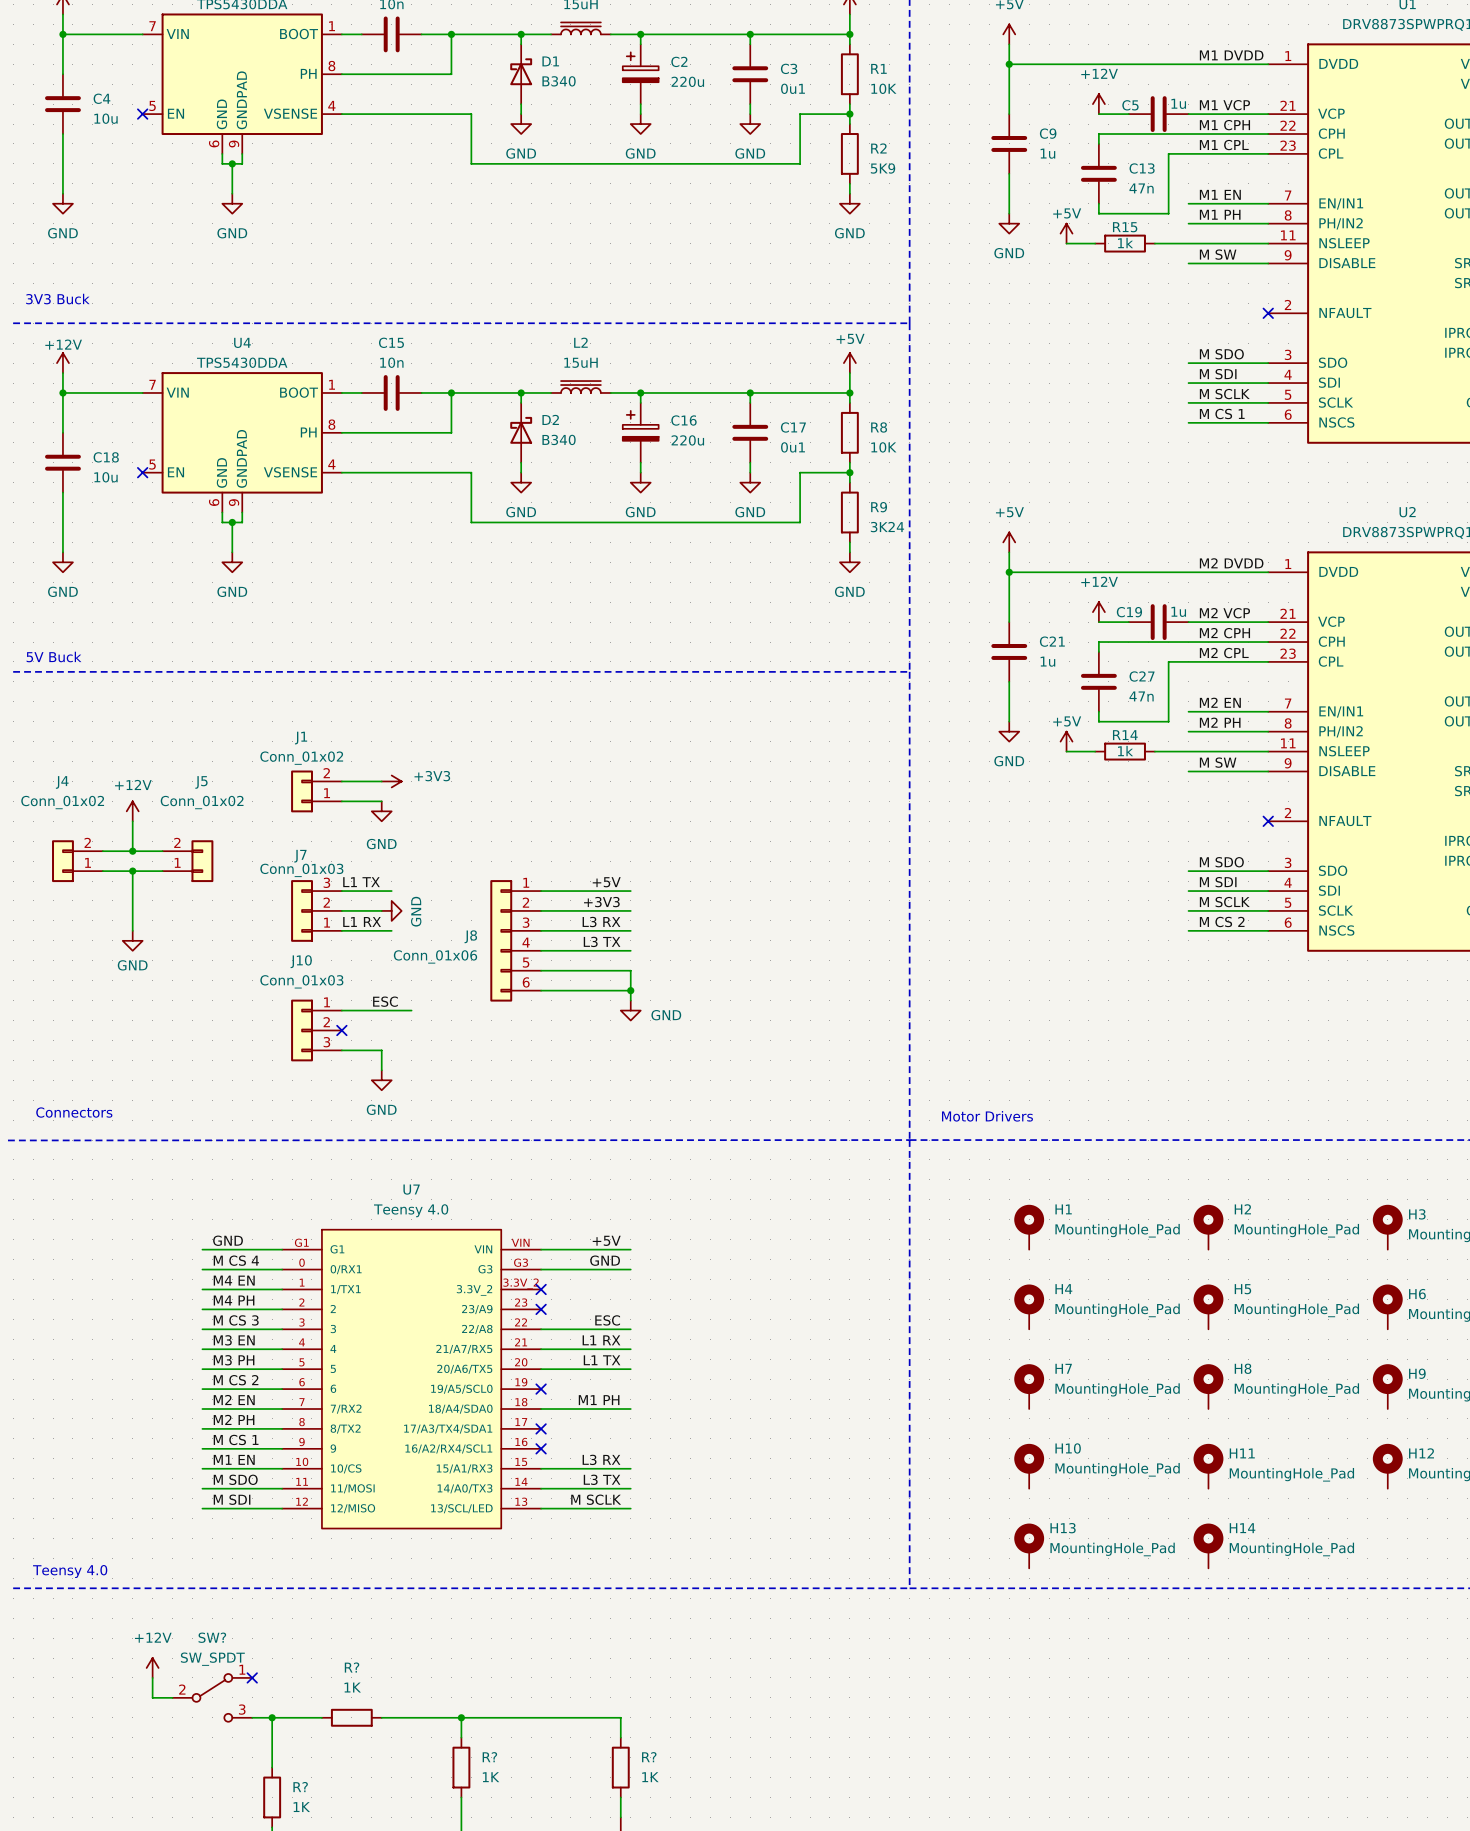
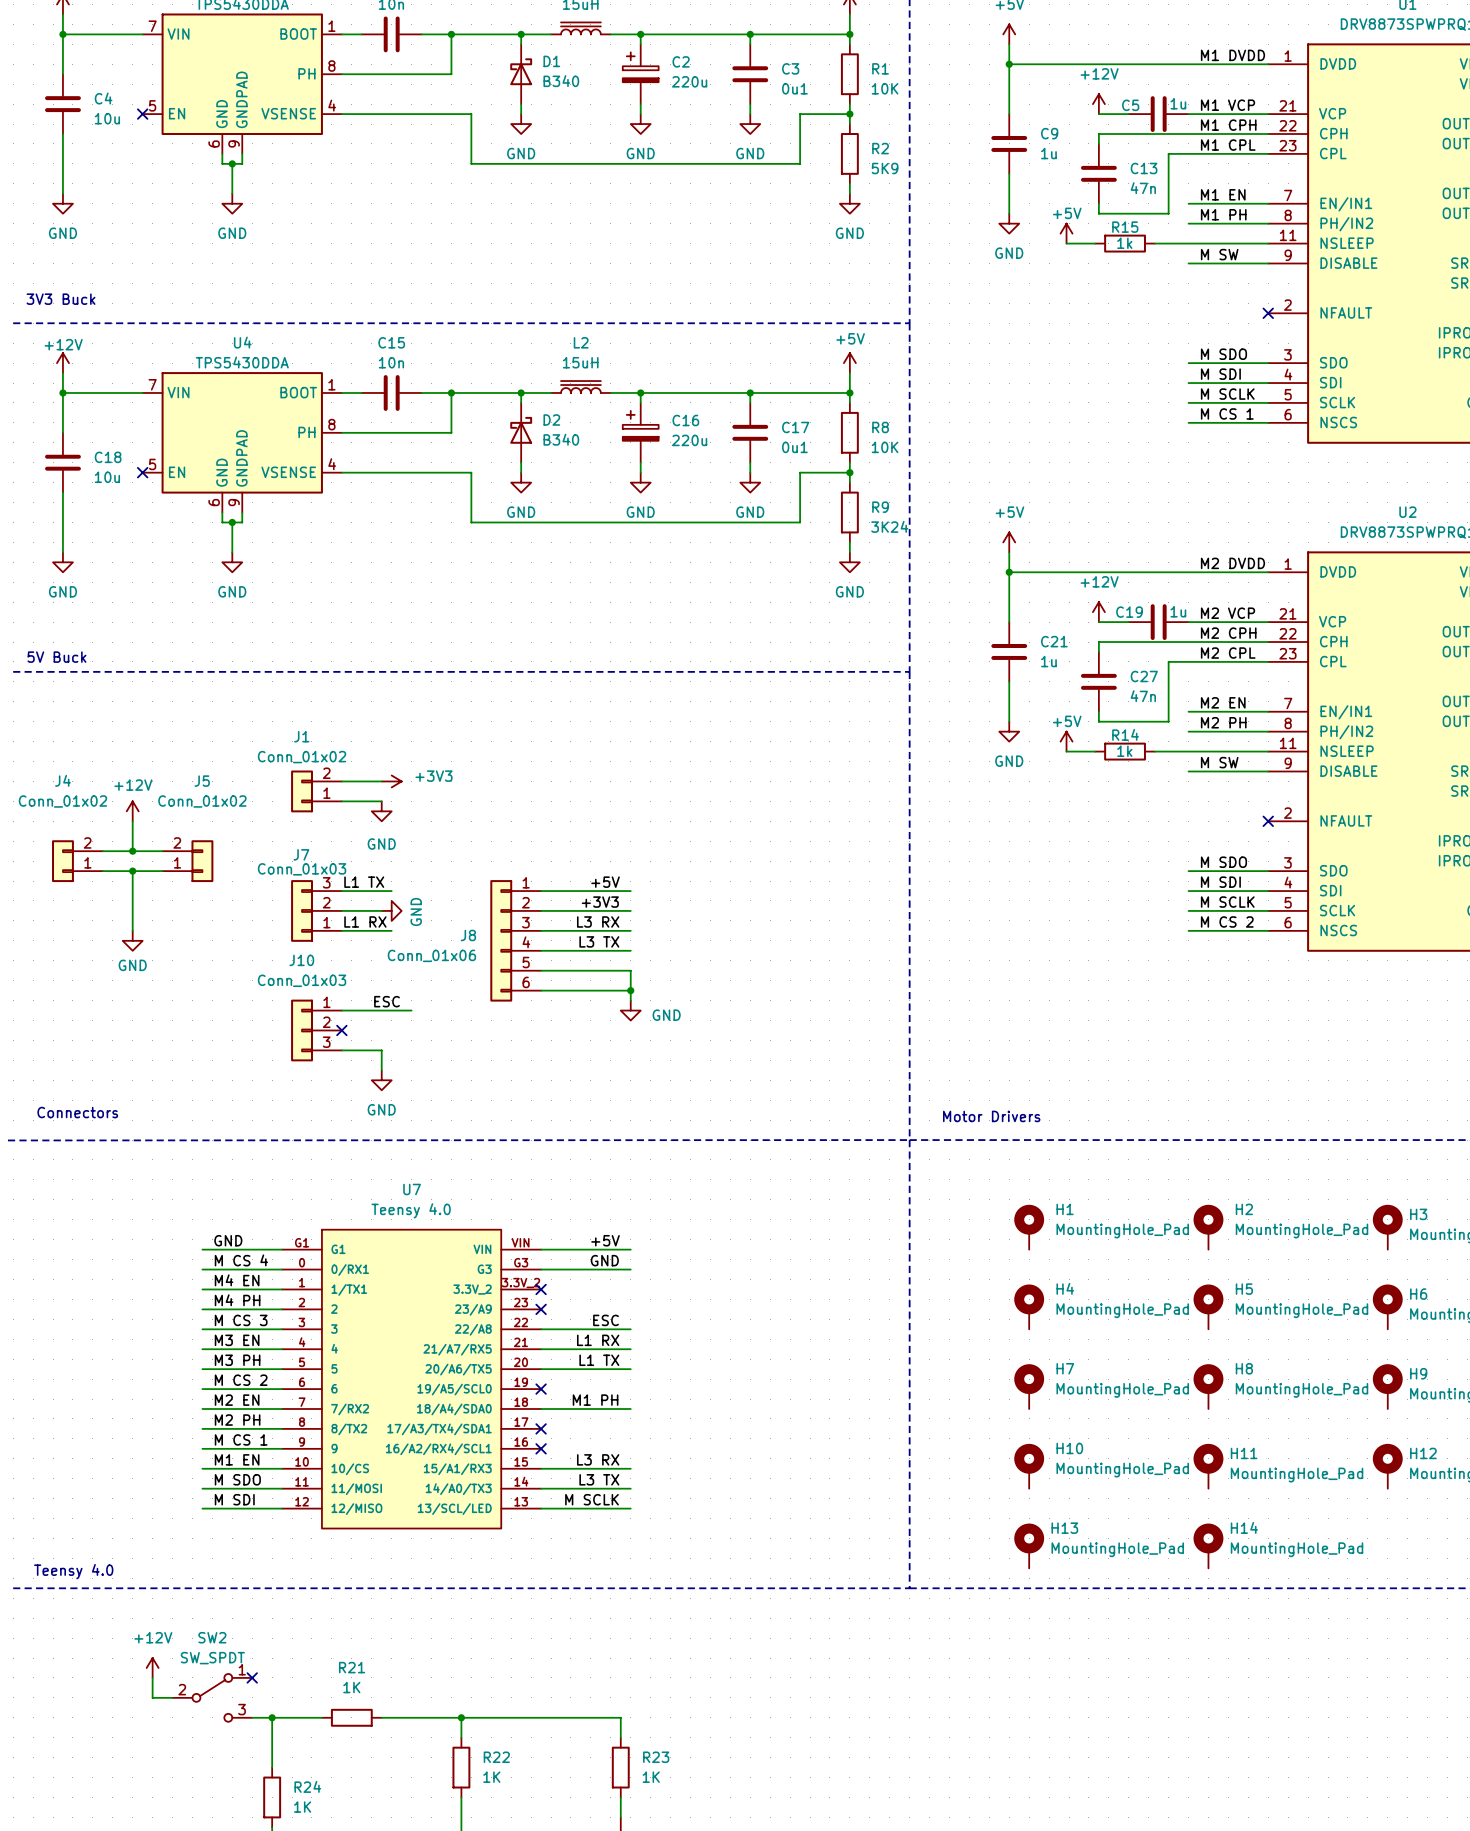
SW? name: SW? (212, 1637) -> SW2 (212, 1637)
R? name: R? (352, 1667) -> R21 (352, 1667)
R? name: R? (489, 1757) -> R22 (496, 1757)
R? name: R? (649, 1757) -> R23 (656, 1757)
R? name: R? (300, 1787) -> R24 (307, 1786)

